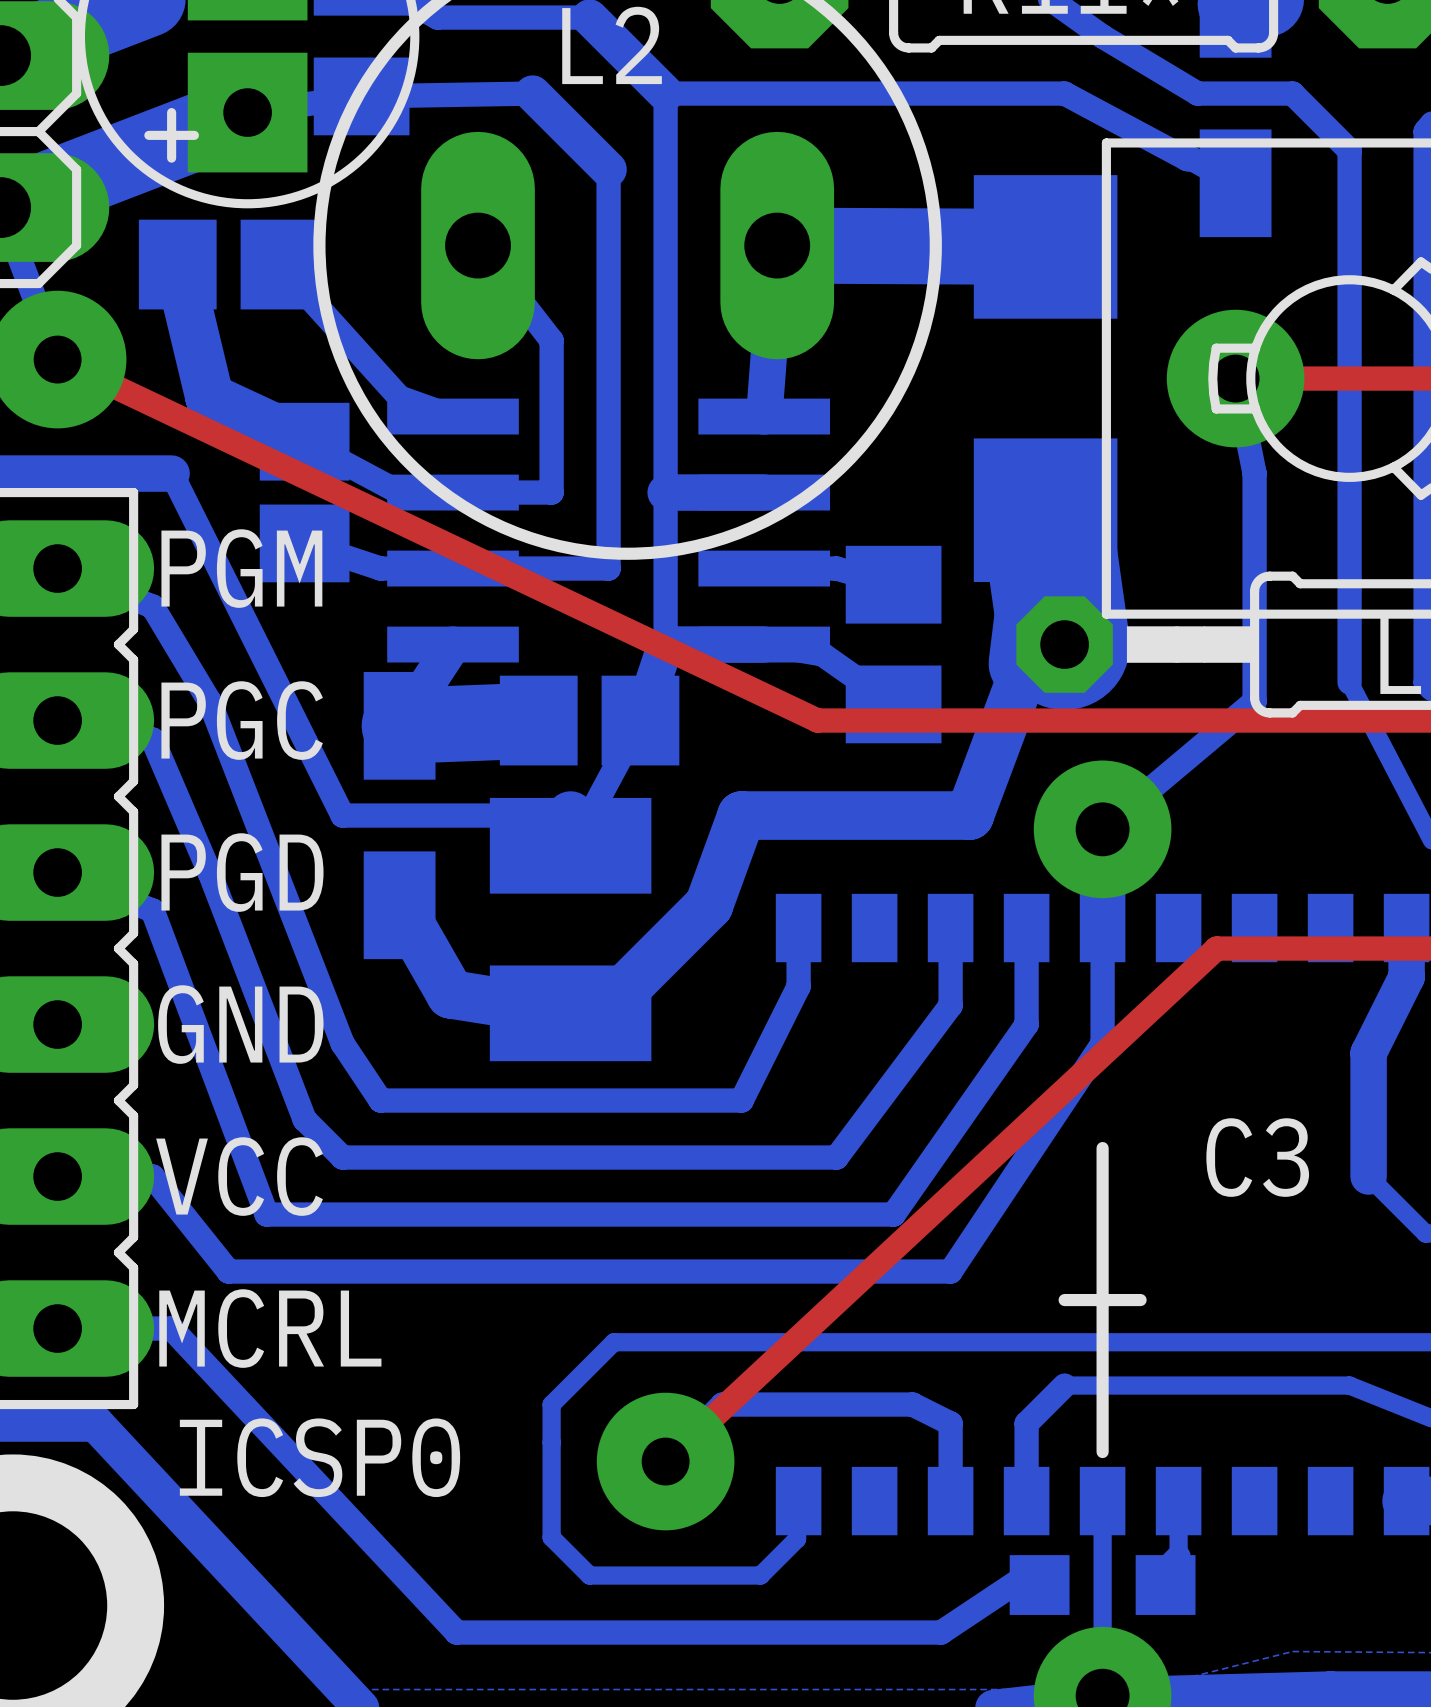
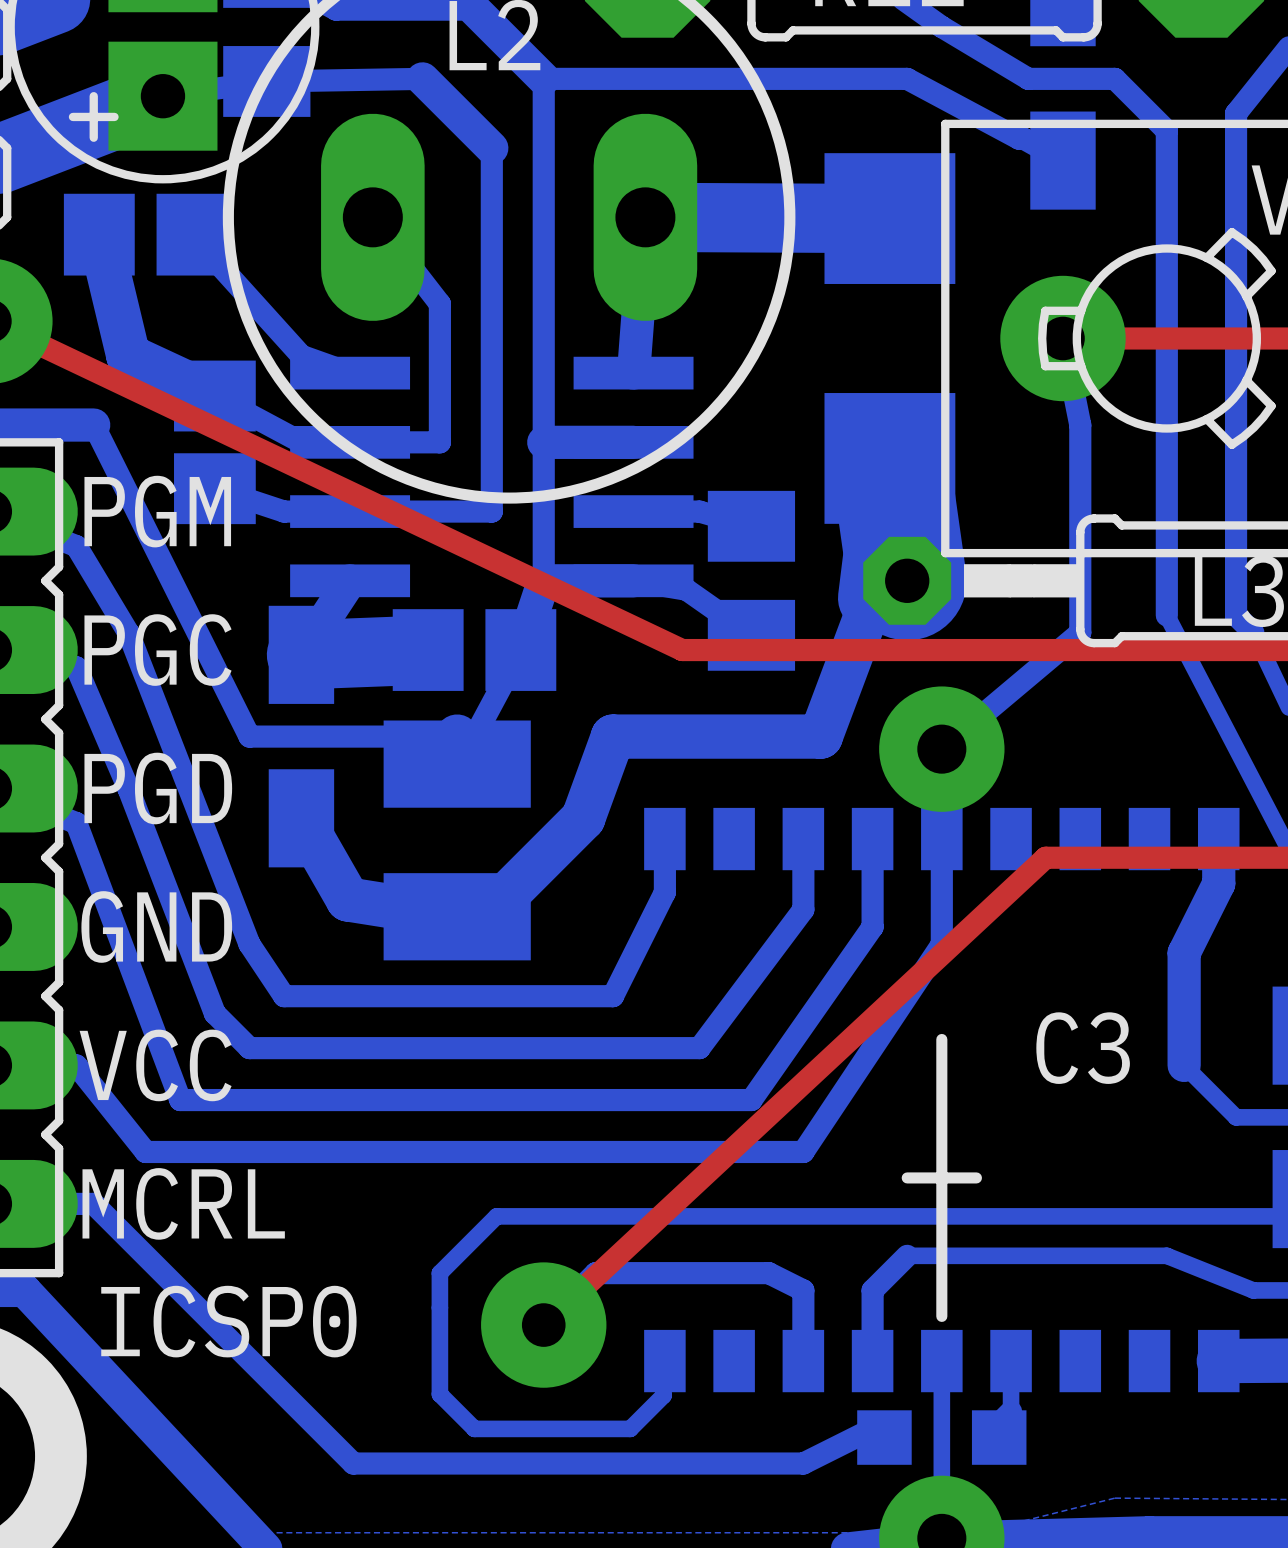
bottom track: (171, 1328) (456, 1632) (941, 1632) (1026, 1575) -> (93, 1203) (353, 1463) (803, 1463) (872, 1428)

